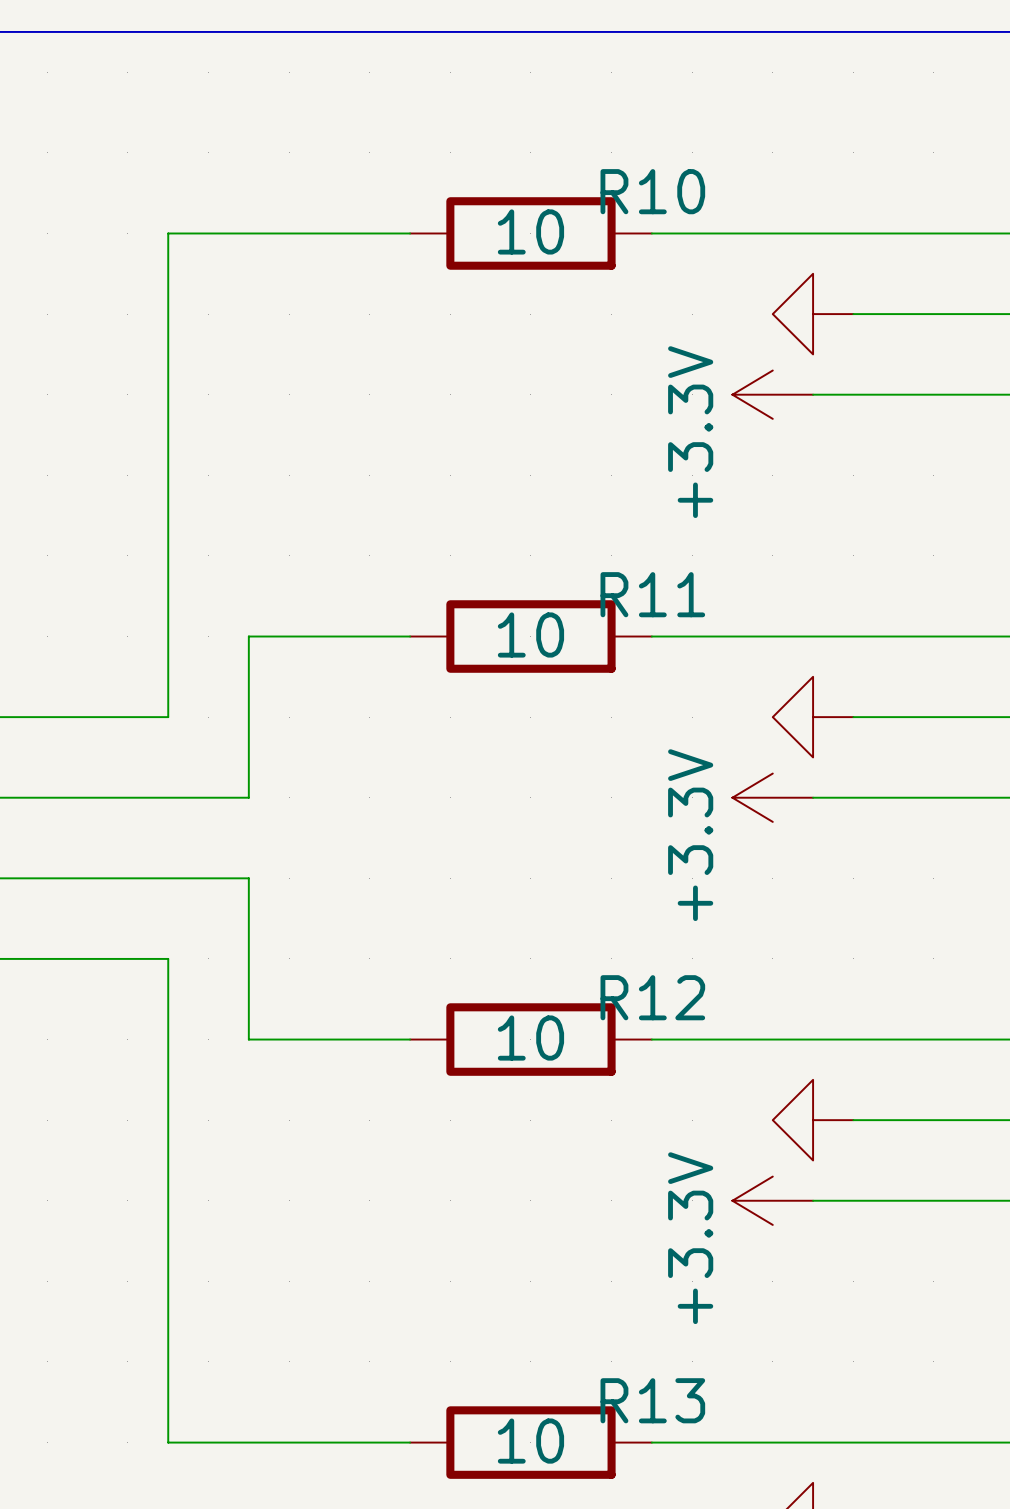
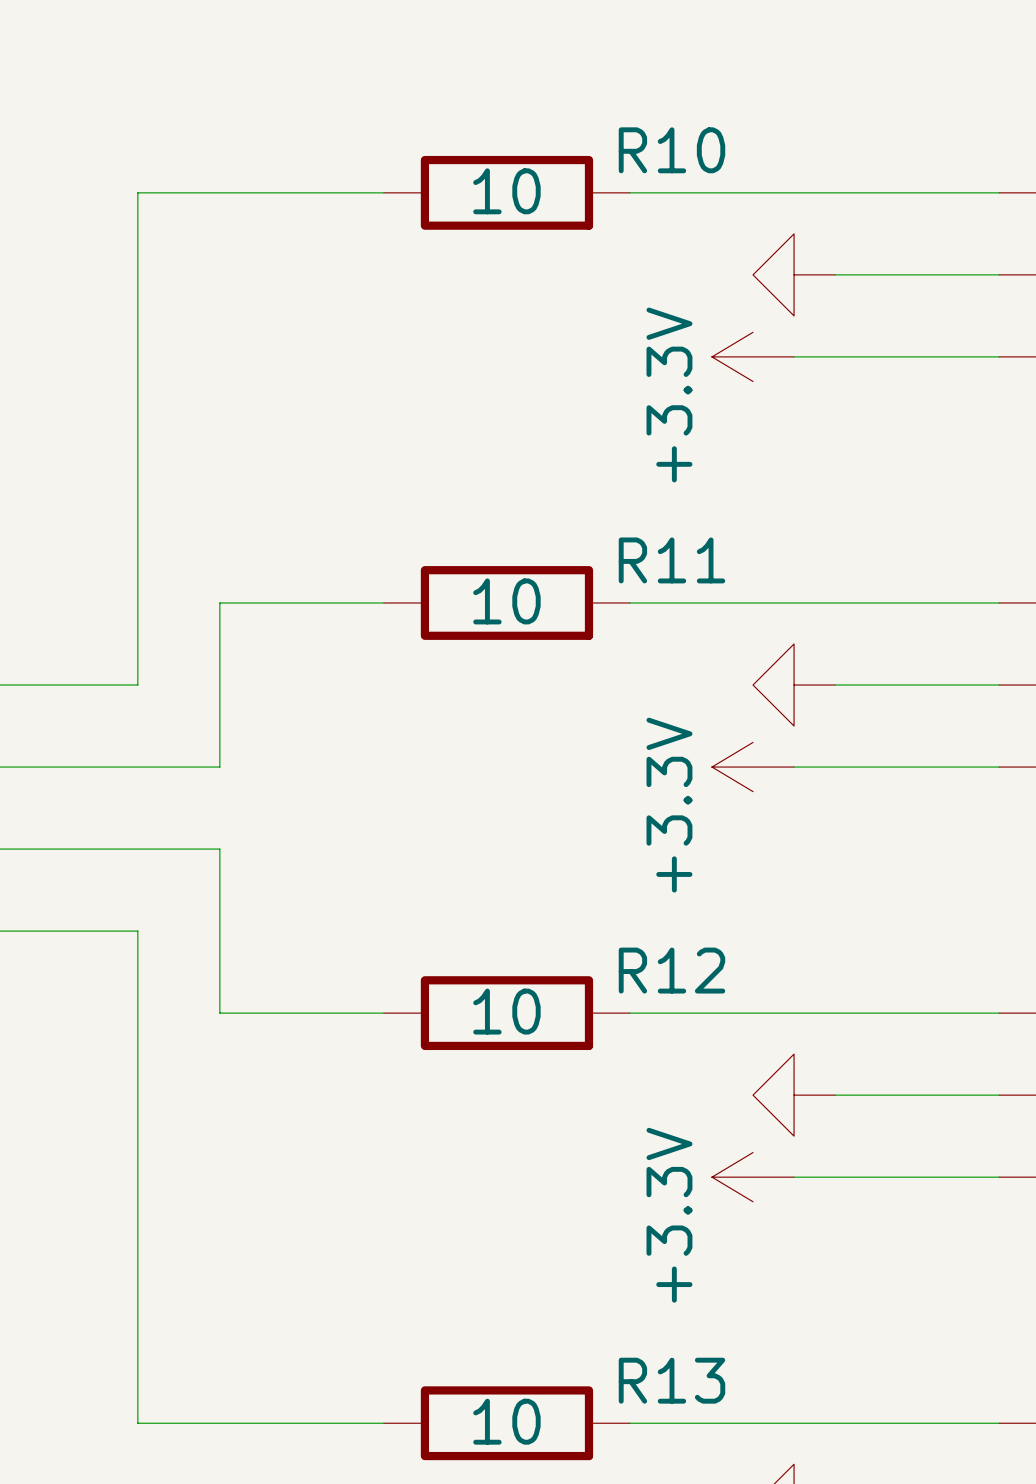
R10 name position: R10 (652, 191) -> R10 (671, 150)
R11 name position: R11 (652, 594) -> R11 (671, 560)
R12 name position: R12 (652, 997) -> R12 (671, 970)
R13 name position: R13 (652, 1400) -> R13 (671, 1380)

